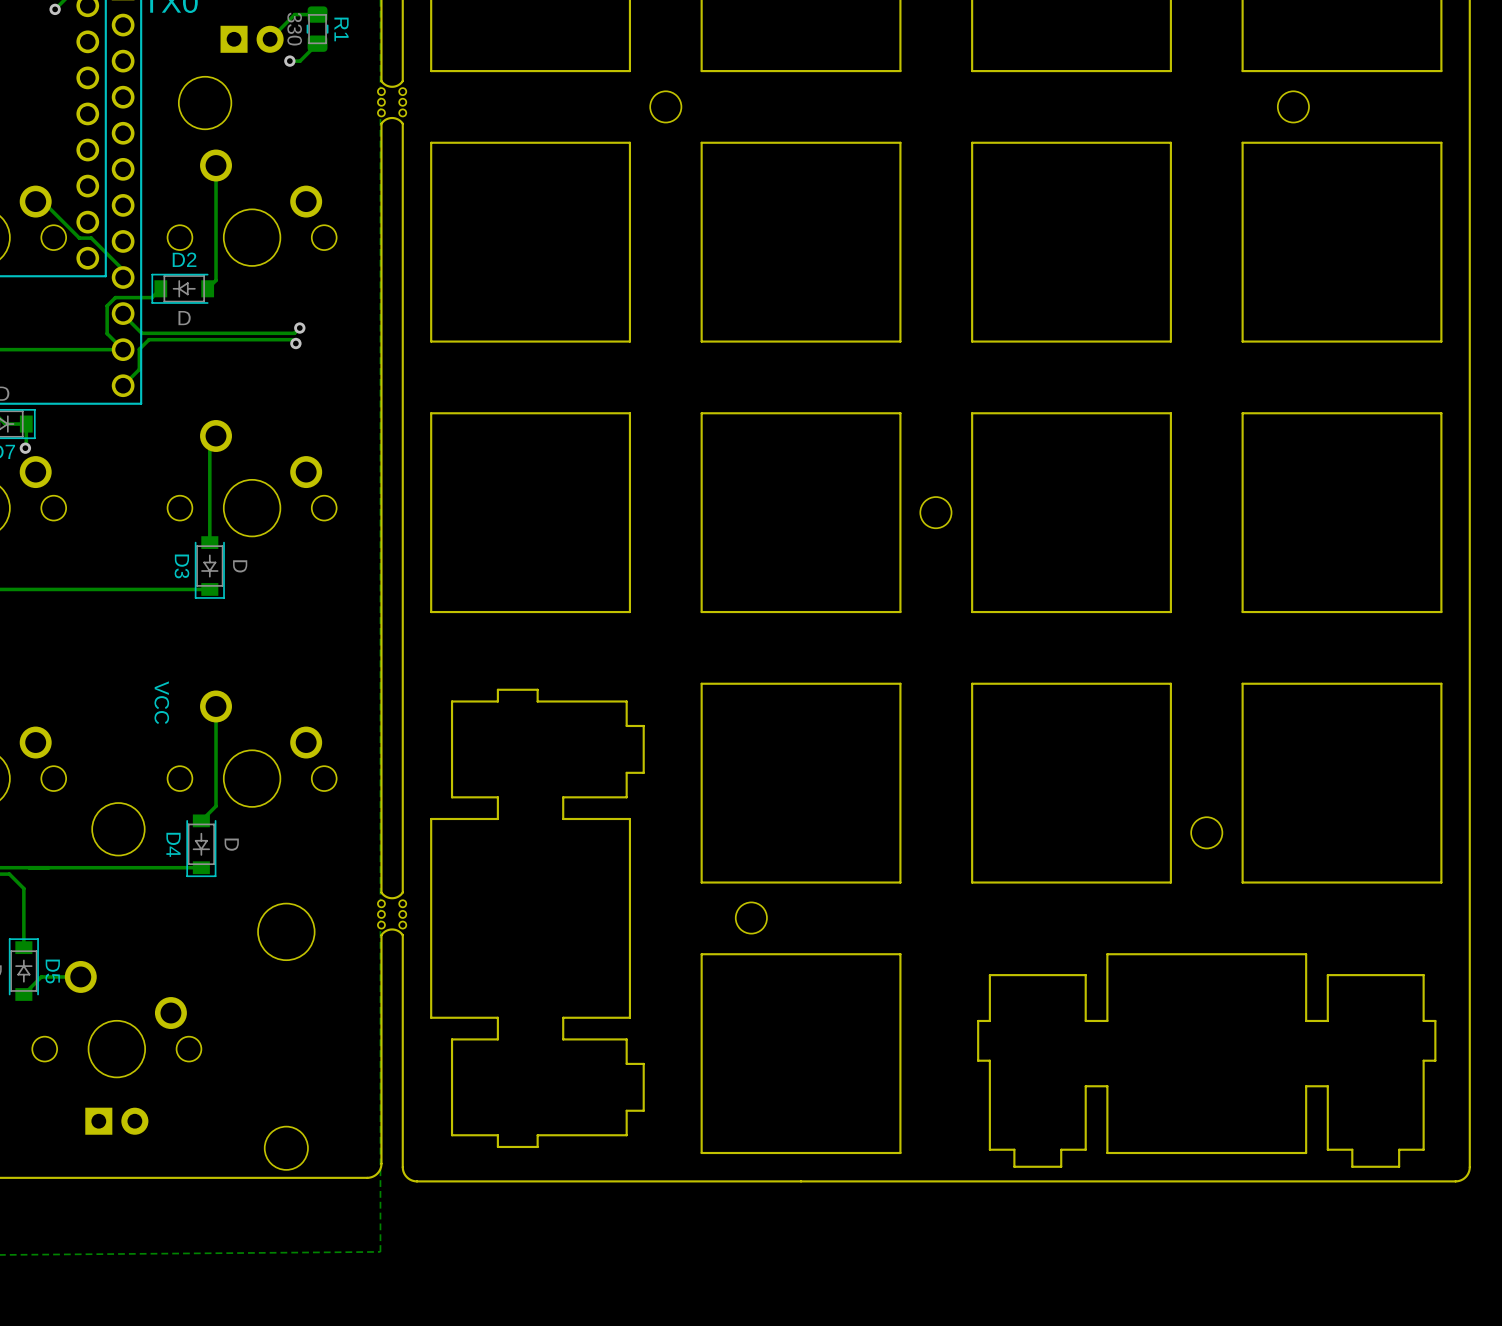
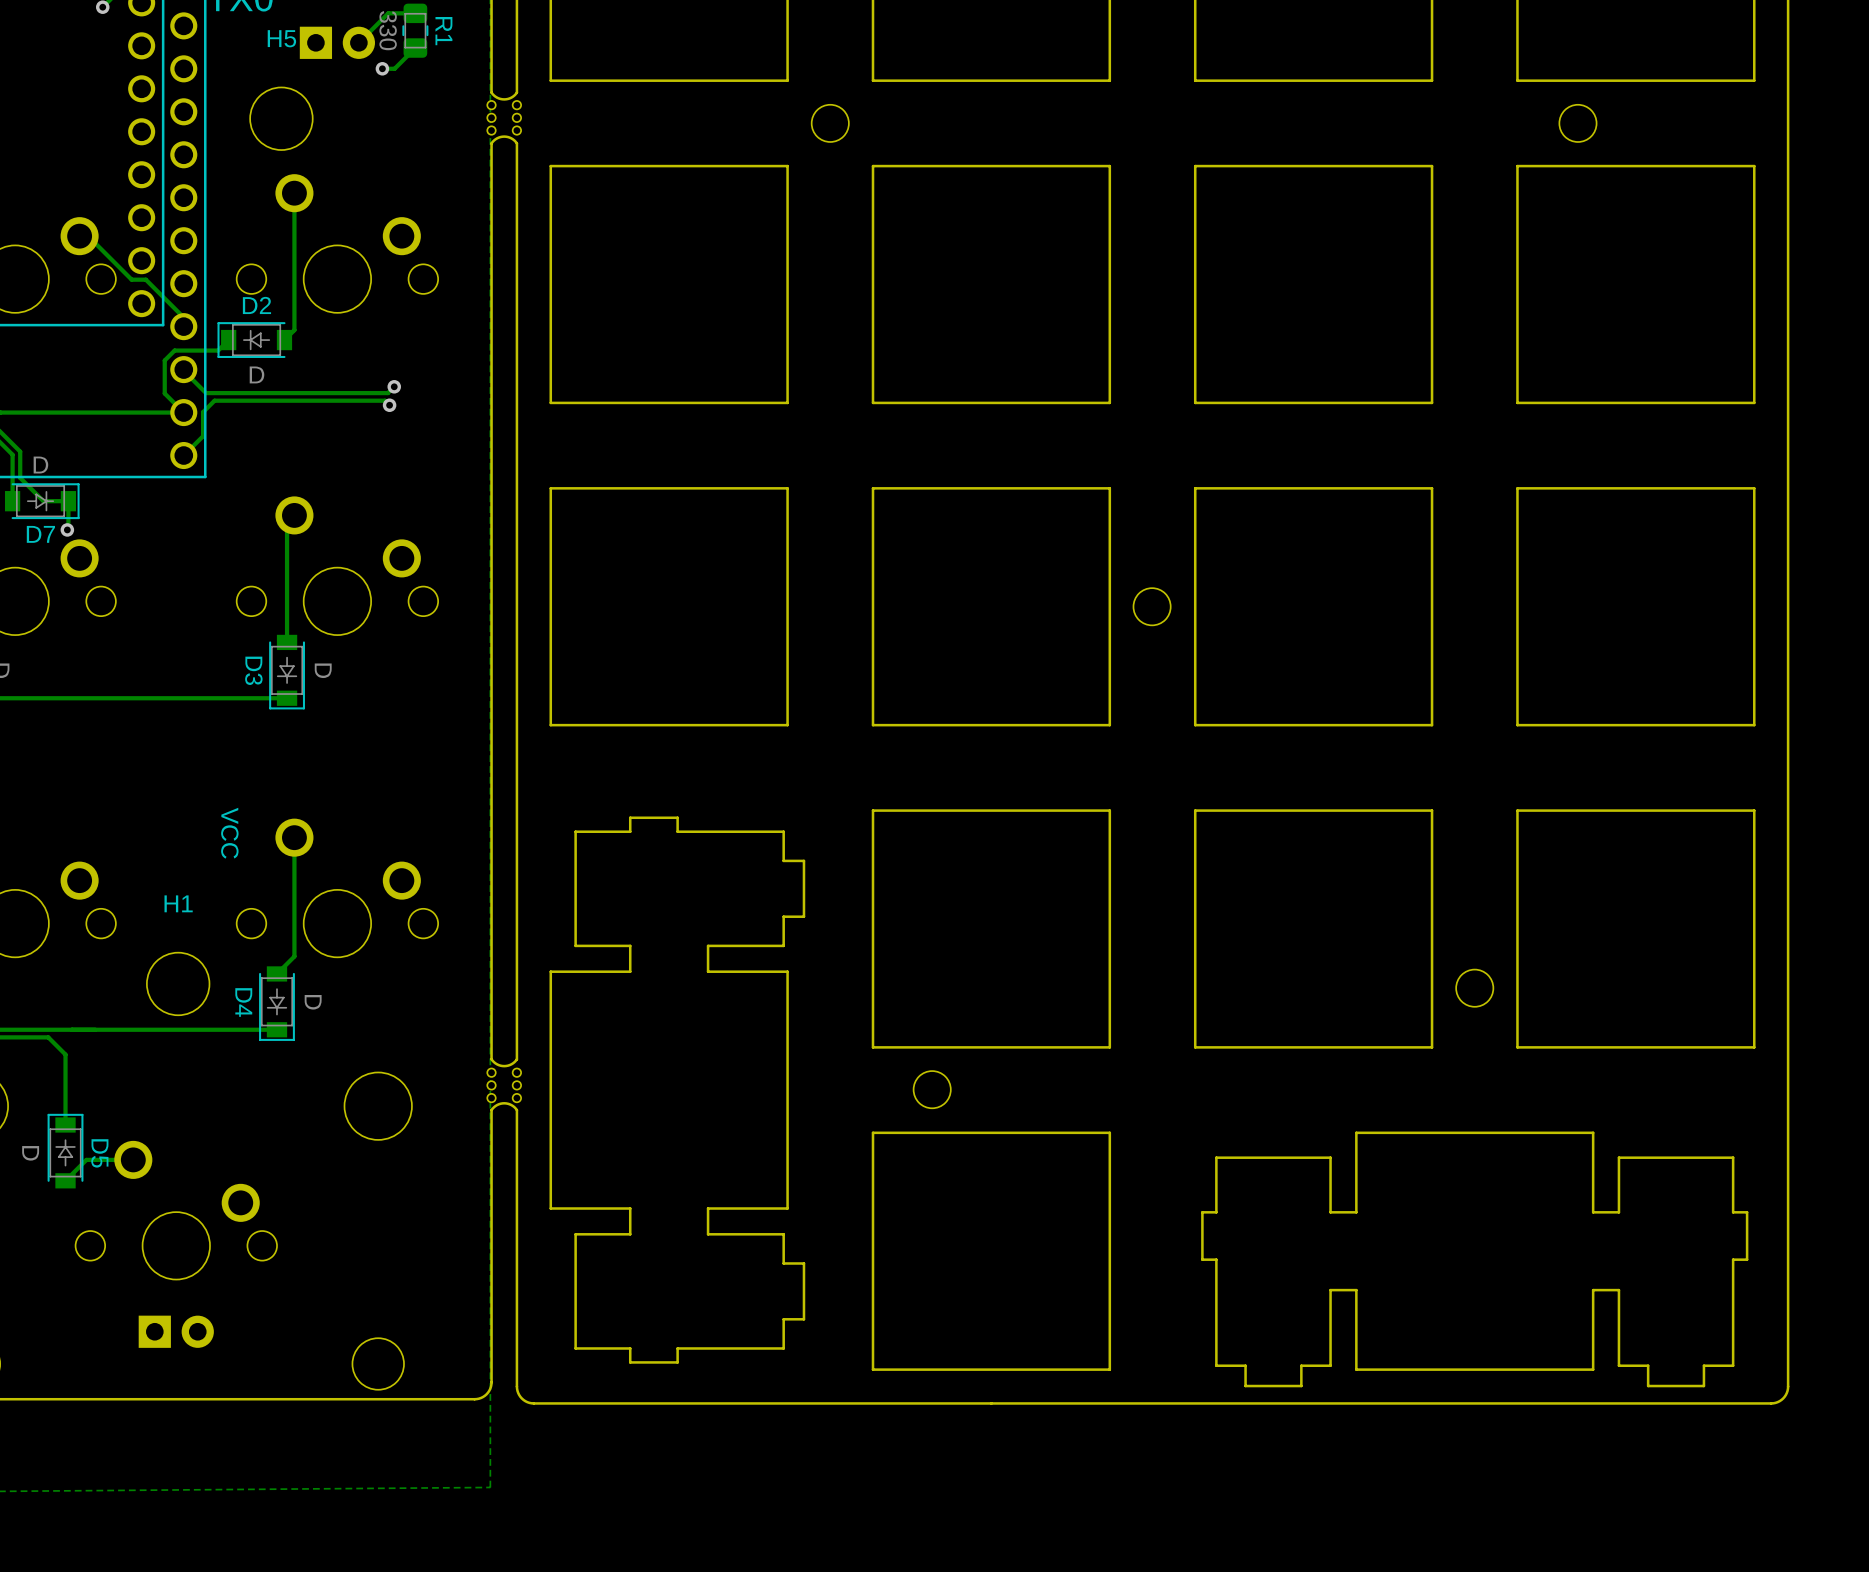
H5 name: none -> H5 (281, 38)
H1 name: none -> H1 (178, 903)

